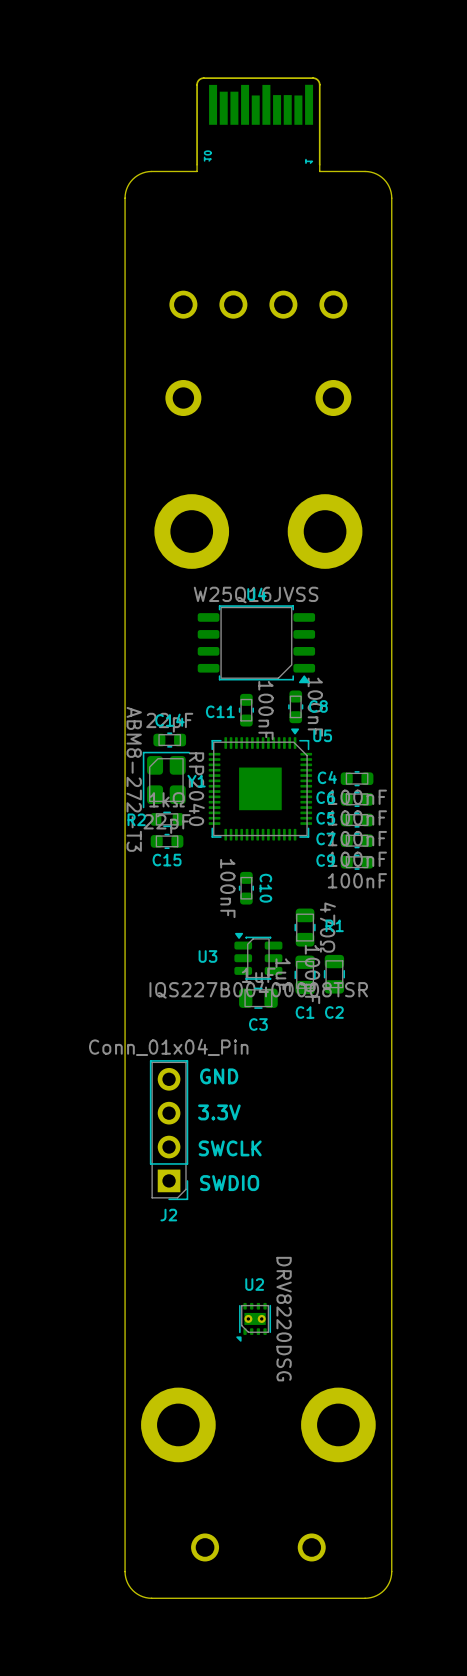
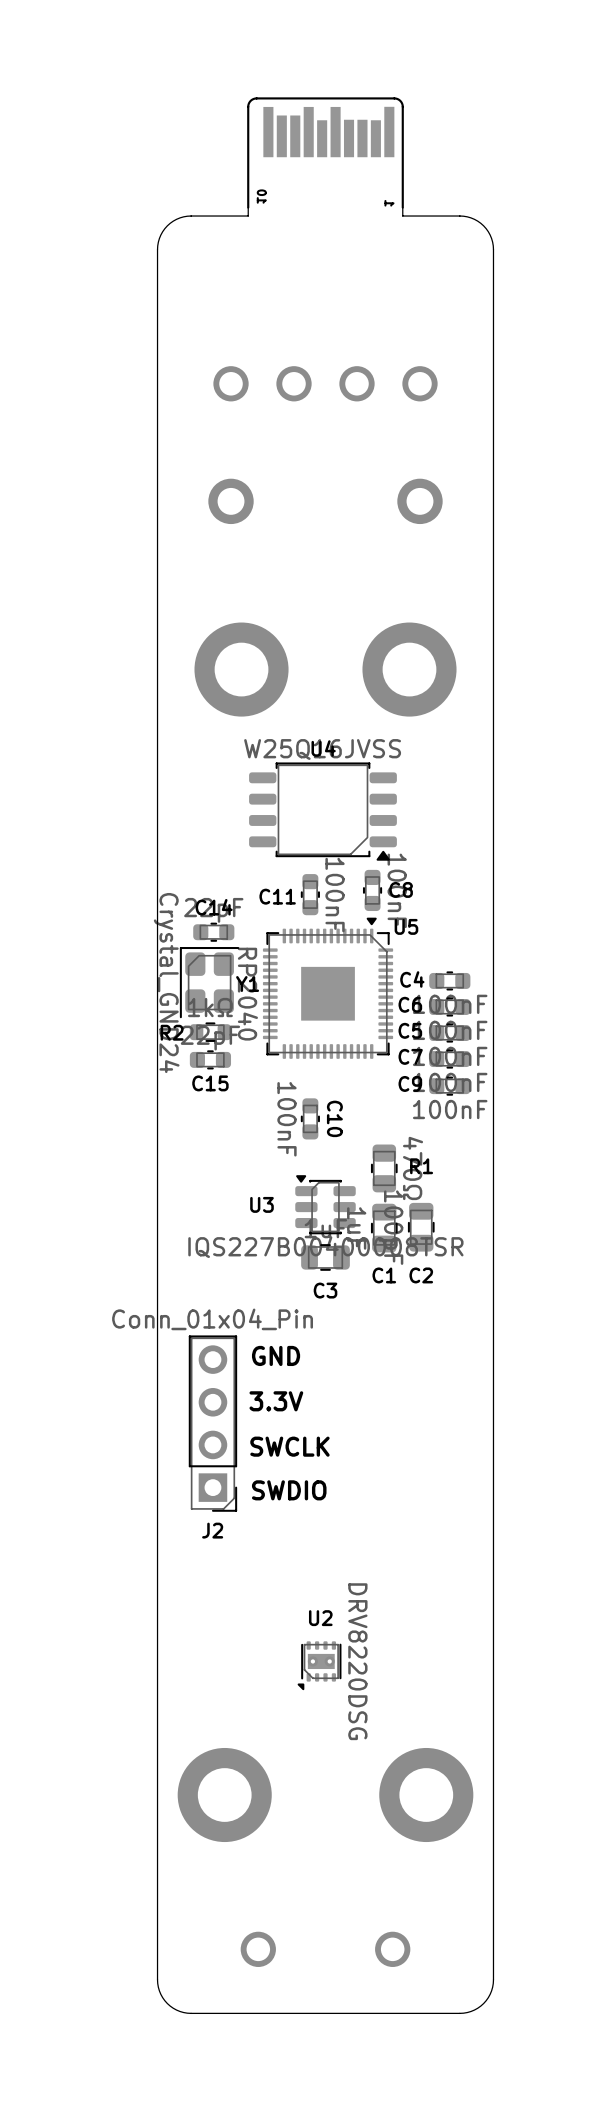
Y1 value: ABM8-272-T3 (134, 779) -> Crystal_GND24 (166, 983)

